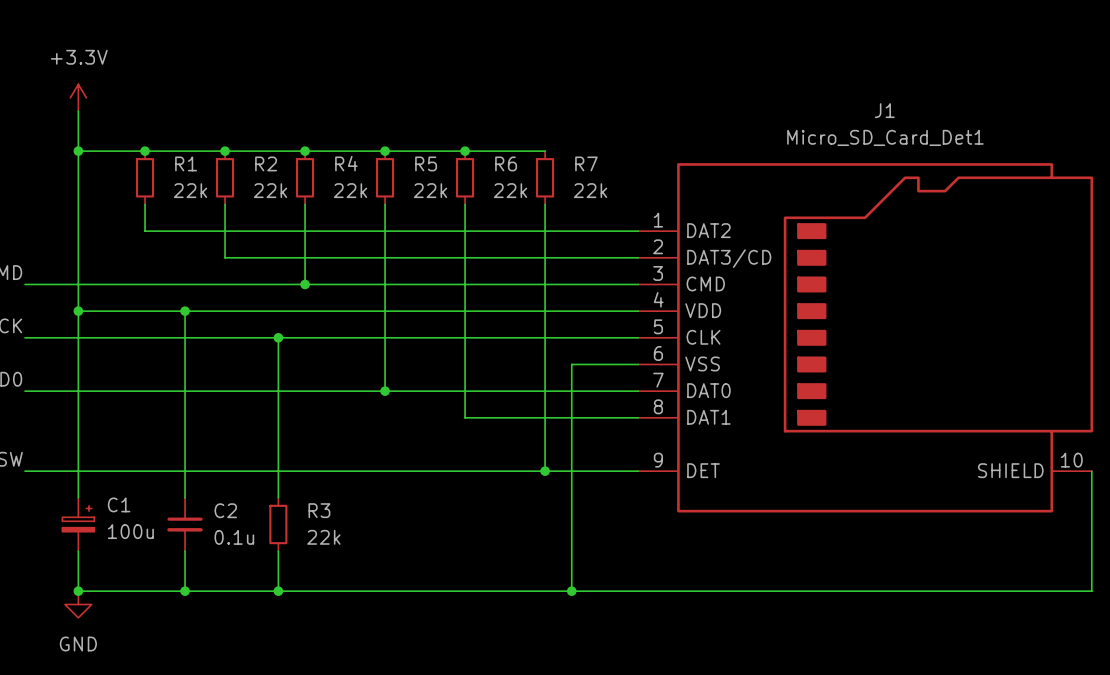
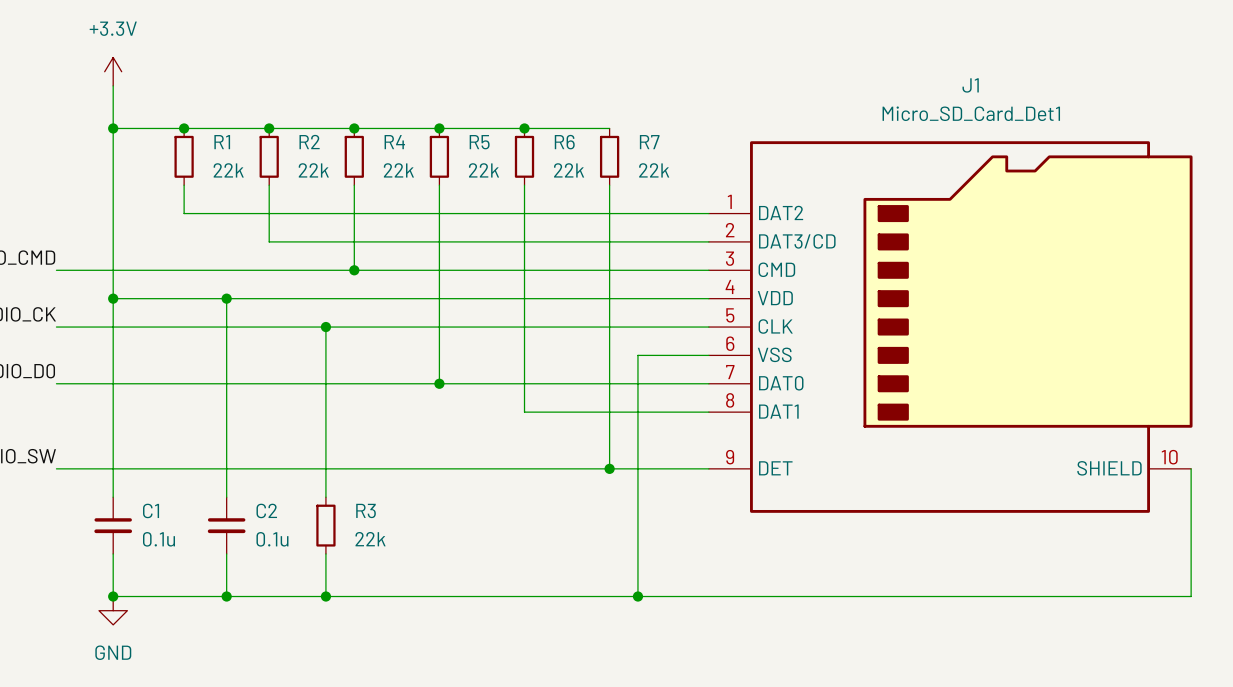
C1 symbol: [62, 497, 95, 552] -> [94, 497, 133, 554]
C1 value: 100u (130, 531) -> 0.1u (159, 539)

